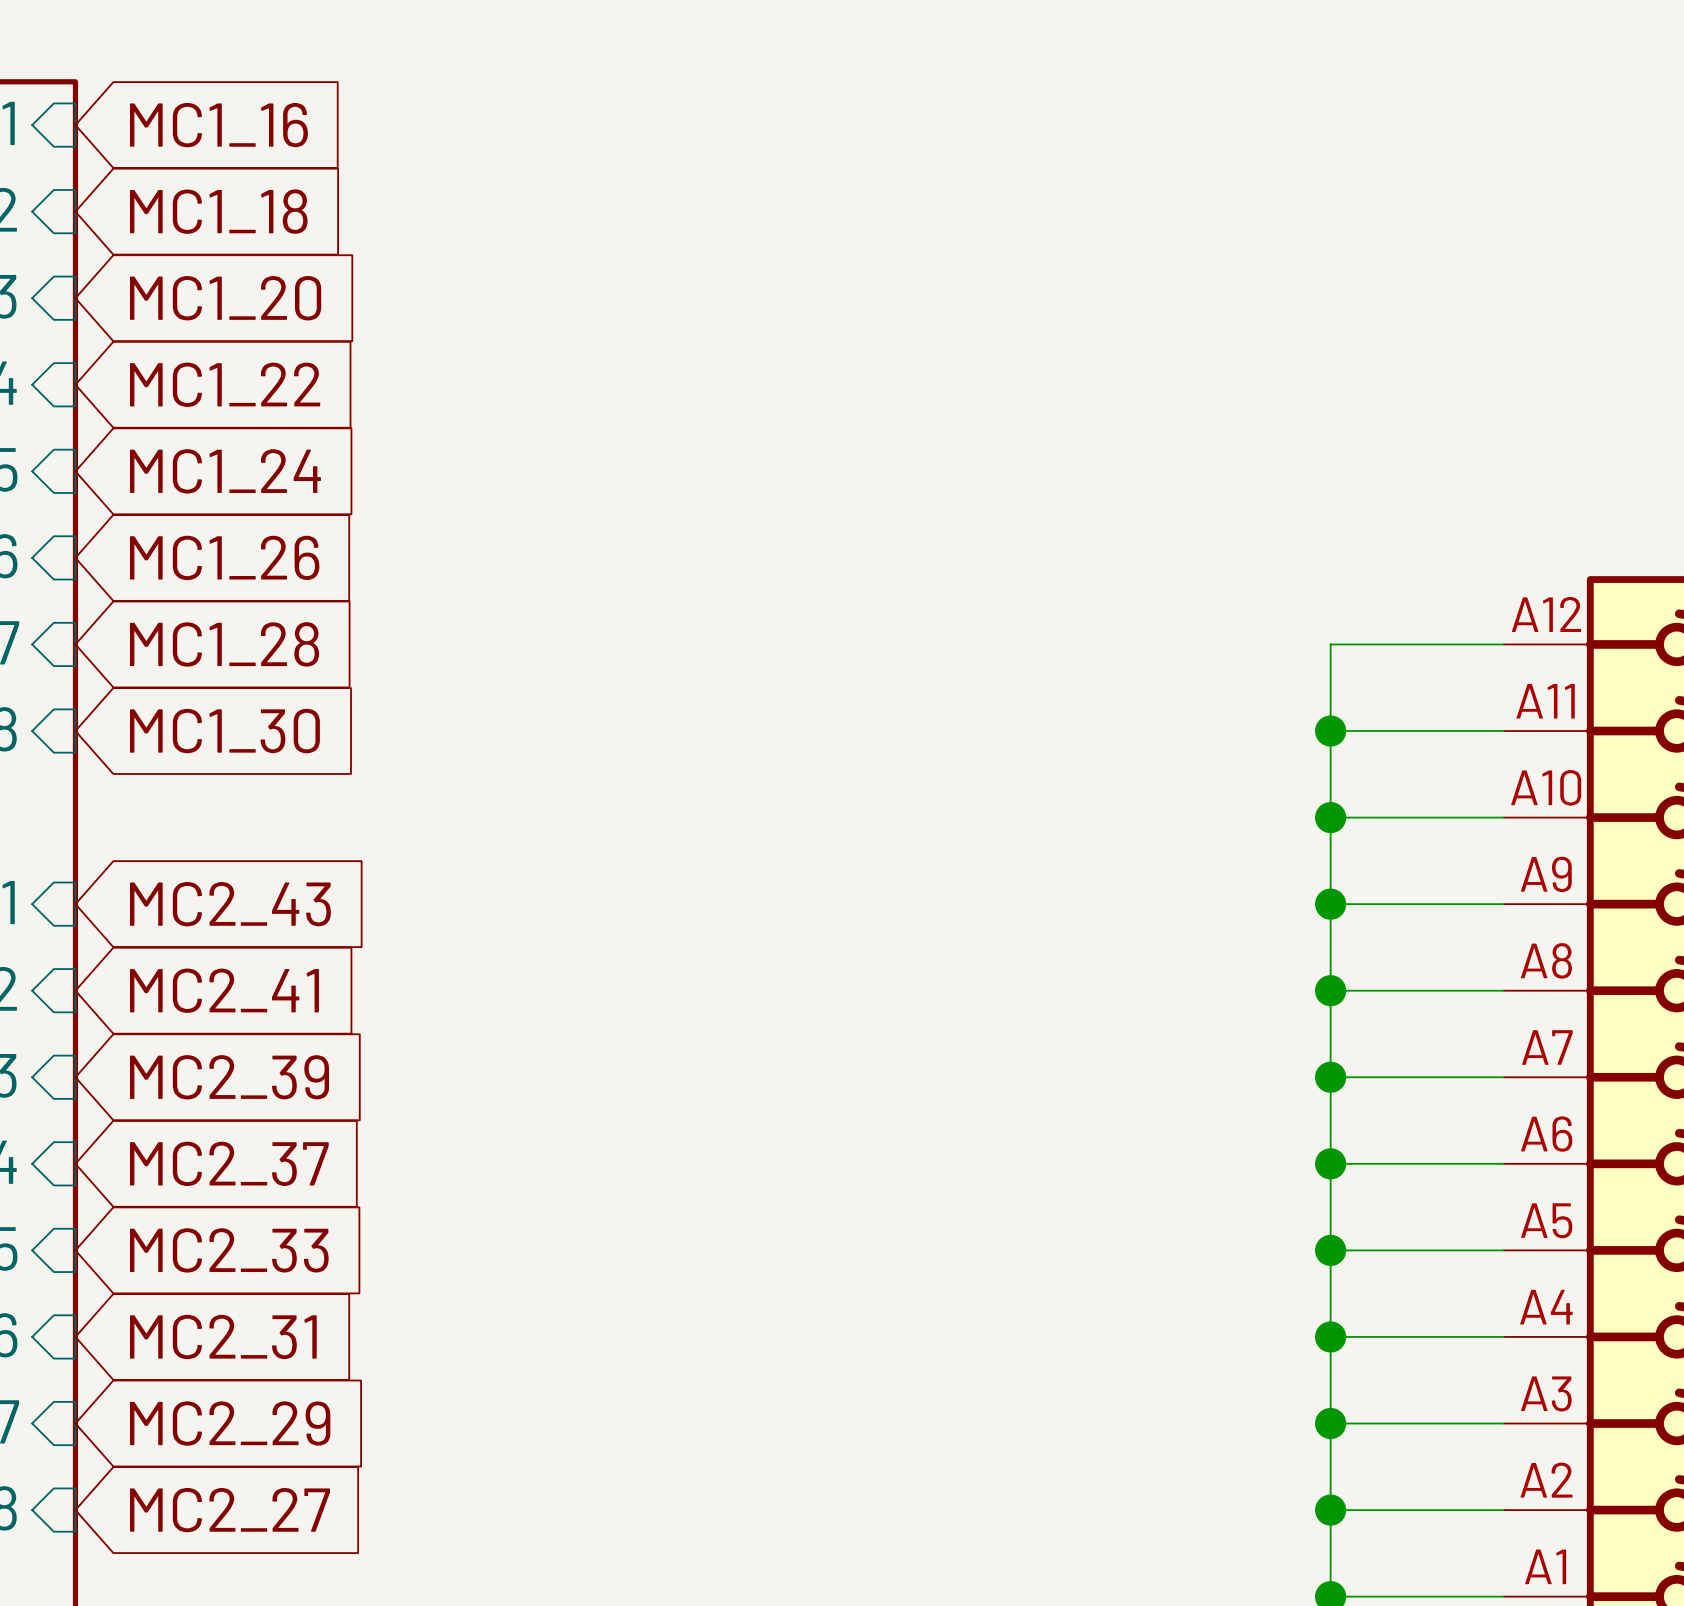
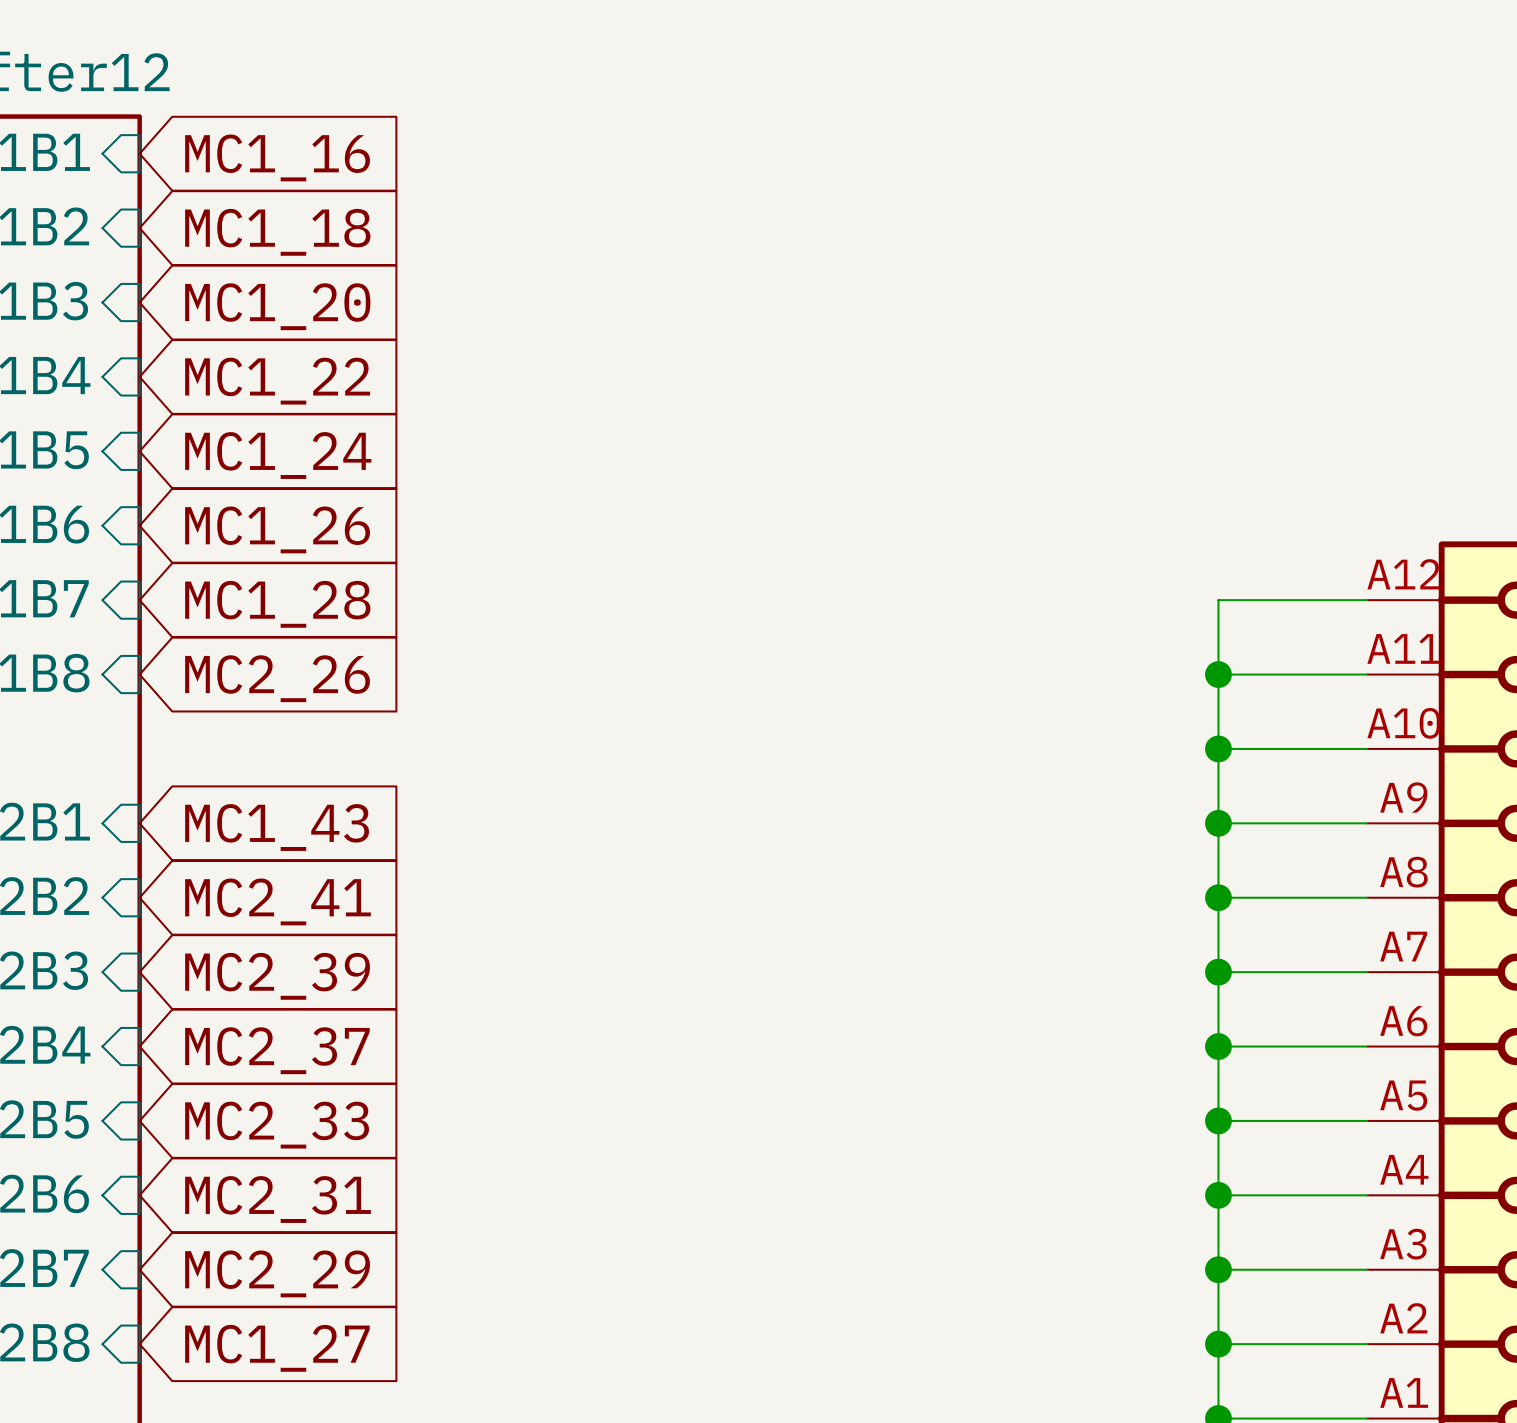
global label: MC1_30 (224, 731) -> MC2_26 (277, 678)
global label: MC2_43 (230, 904) -> MC1_43 (277, 827)
global label: MC2_27 (229, 1510) -> MC1_27 (277, 1348)

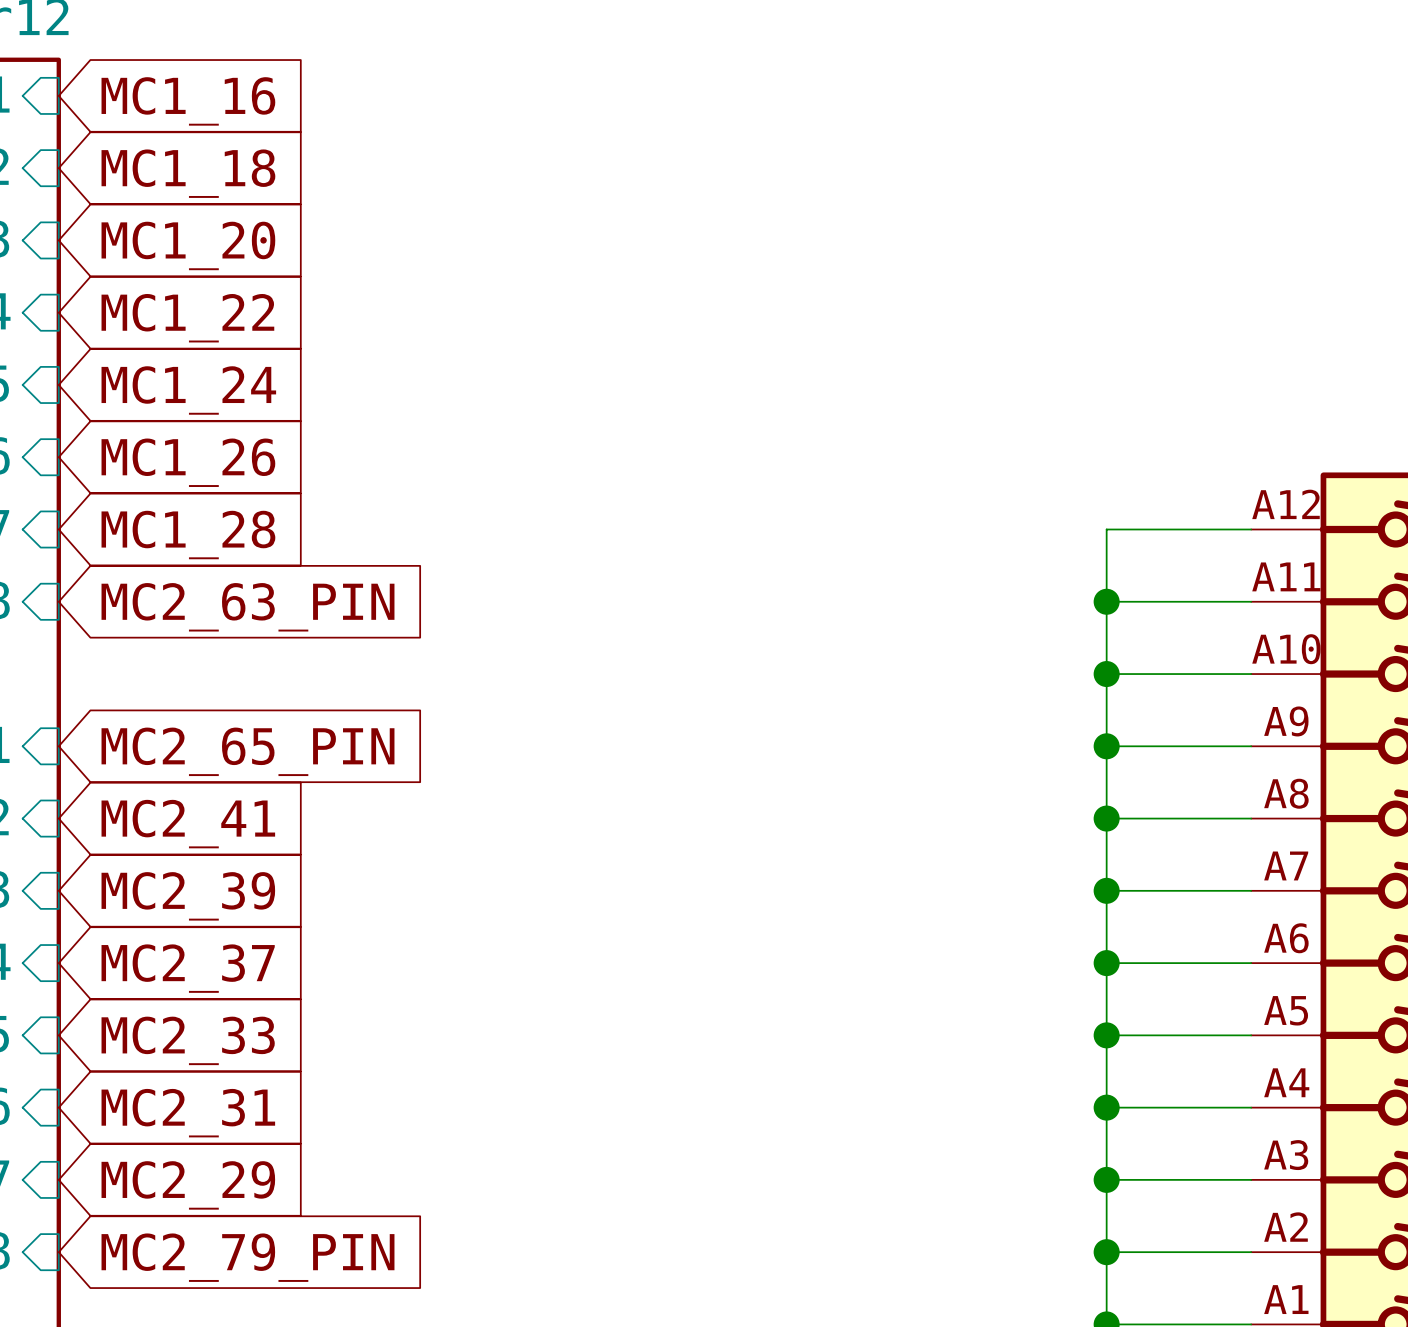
global label: MC2_26 (277, 678) -> MC2_63_PIN (247, 607)
global label: MC1_43 (277, 827) -> MC2_65_PIN (247, 751)
global label: MC1_27 (277, 1348) -> MC2_79_PIN (247, 1257)

